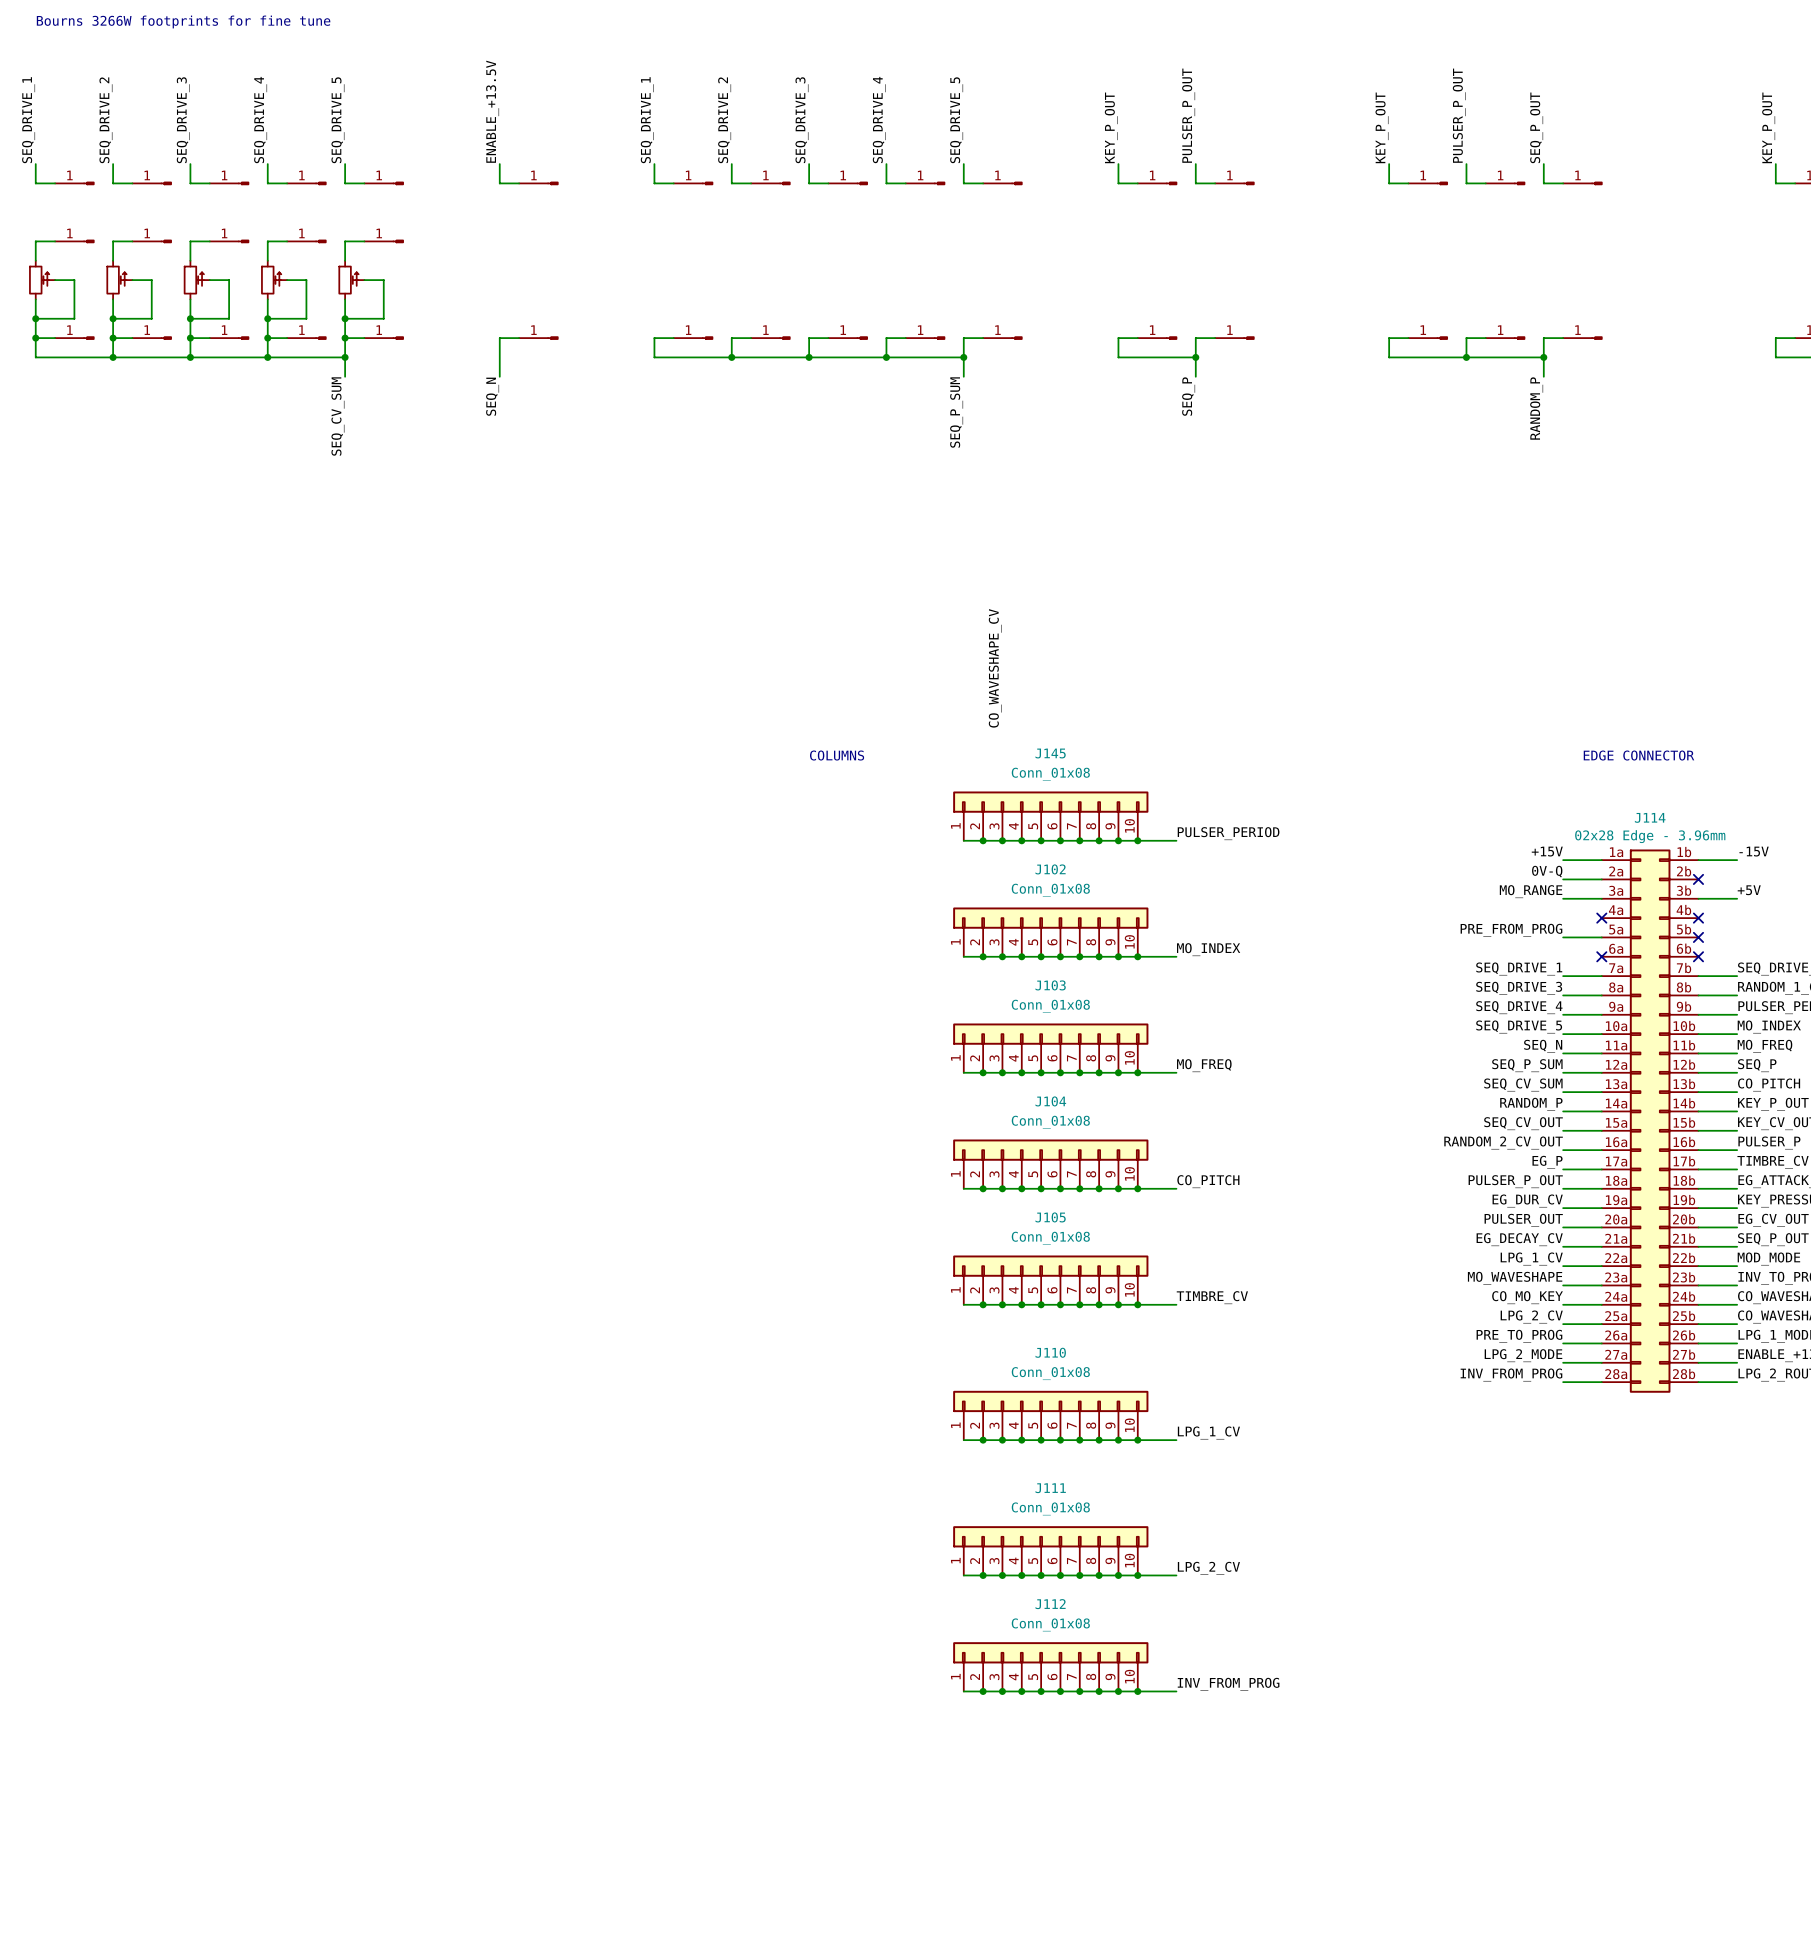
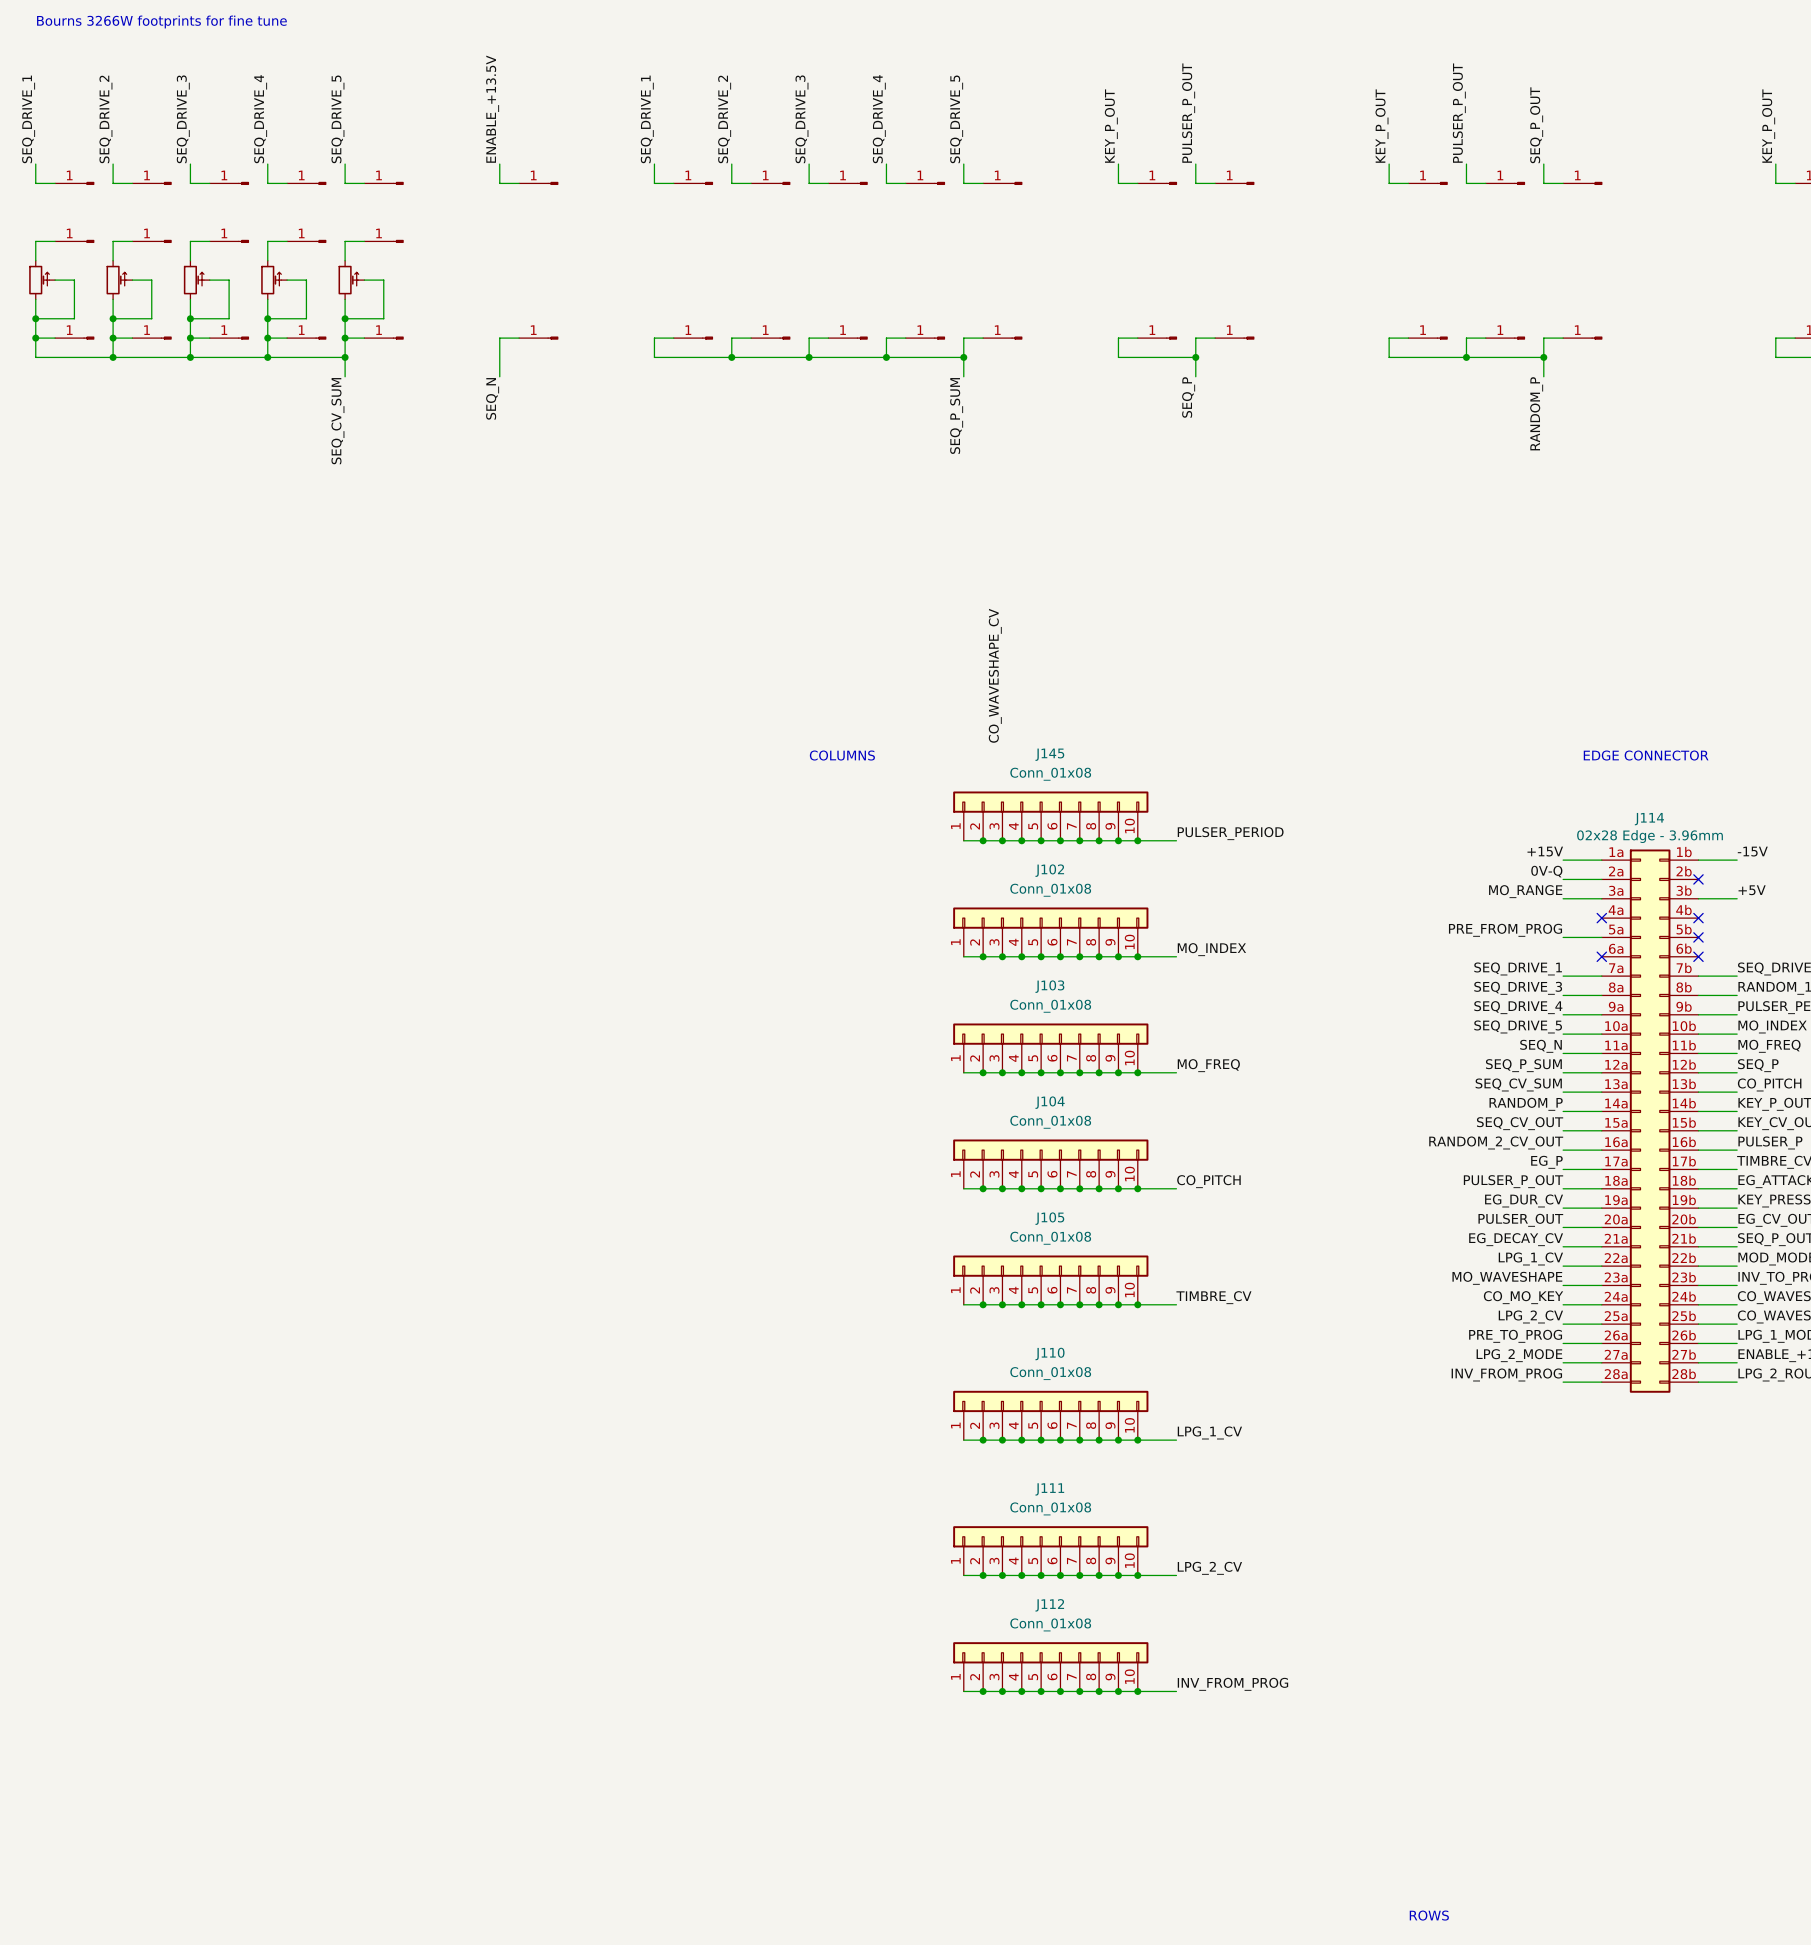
text: none -> ROWS (1429, 1915)

